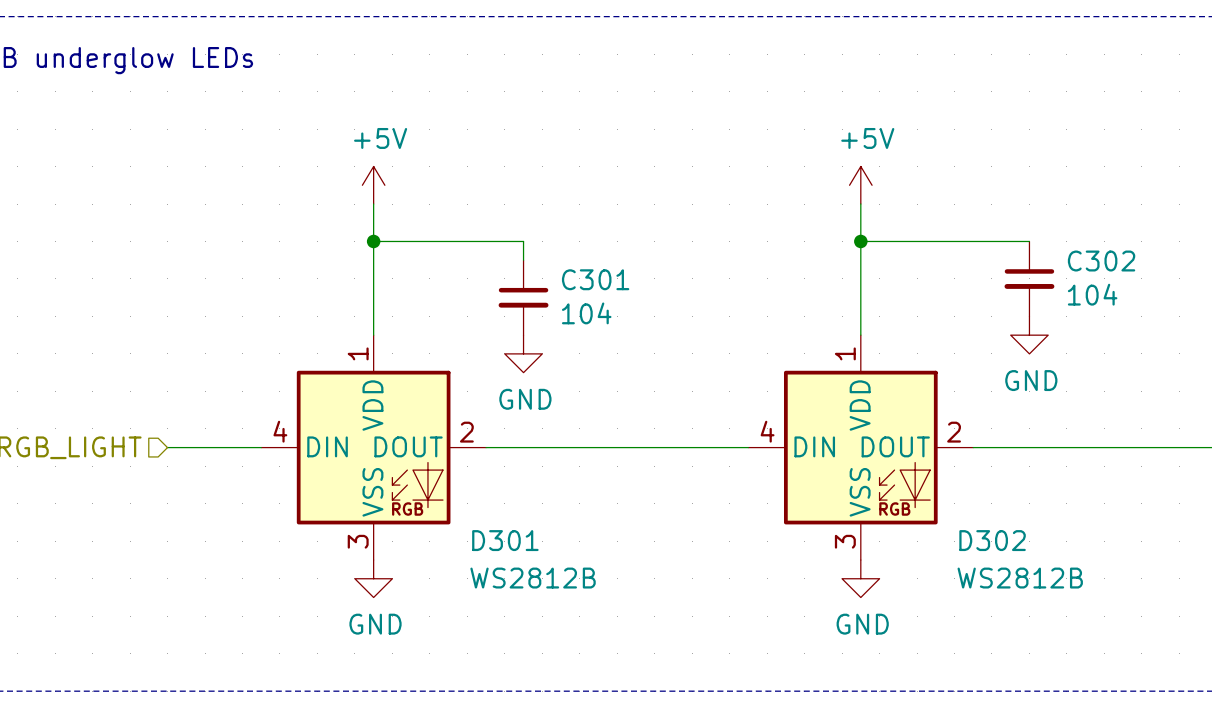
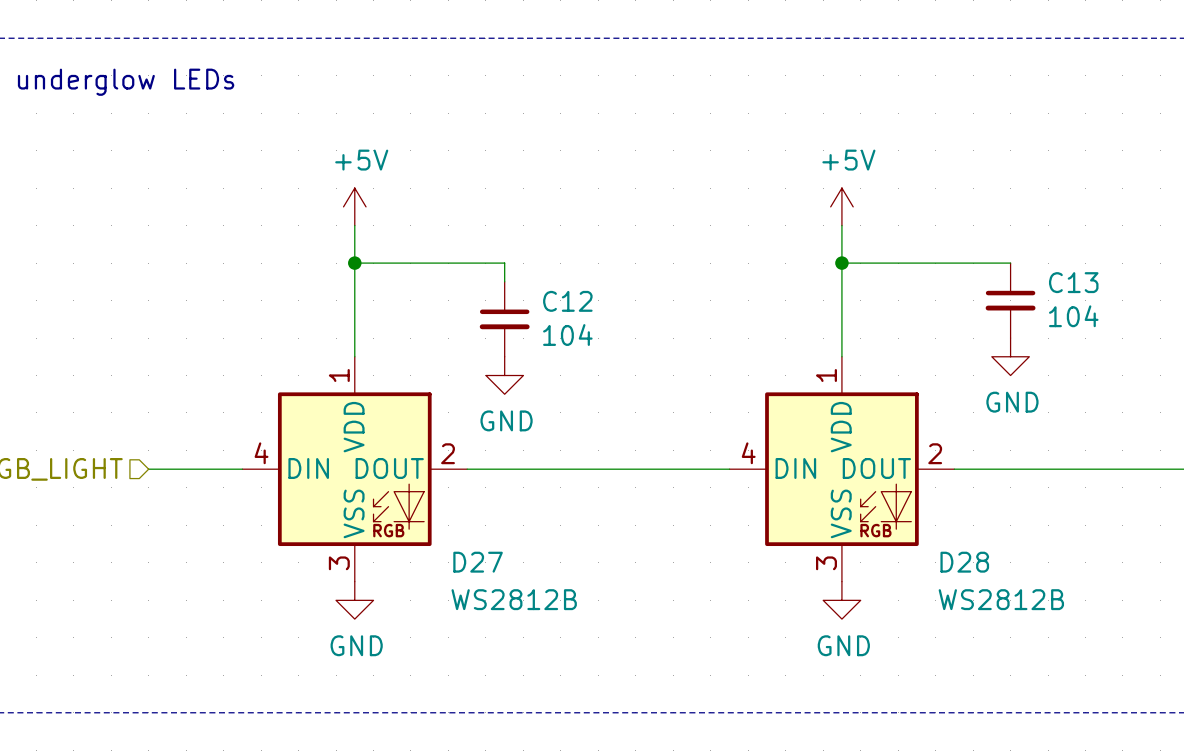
C302 name: C302 (1101, 261) -> C13 (1073, 282)
C301 name: C301 (595, 279) -> C12 (567, 301)
D301 name: D301 (505, 540) -> D27 (478, 562)
D302 name: D302 (992, 540) -> D28 (964, 562)

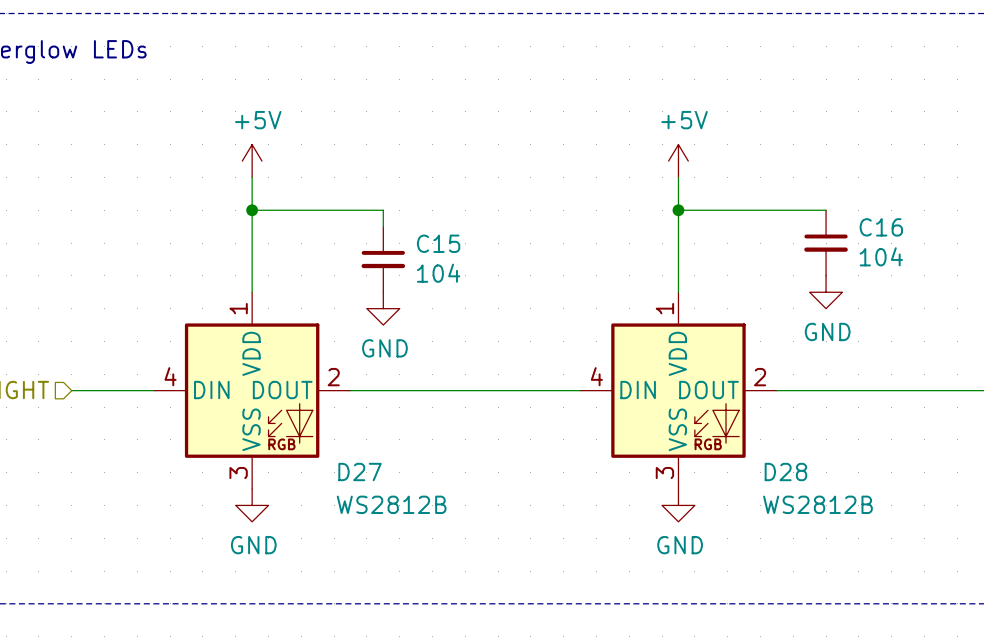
C13 name: C13 (1073, 282) -> C16 (881, 227)
C12 name: C12 (567, 301) -> C15 (438, 243)

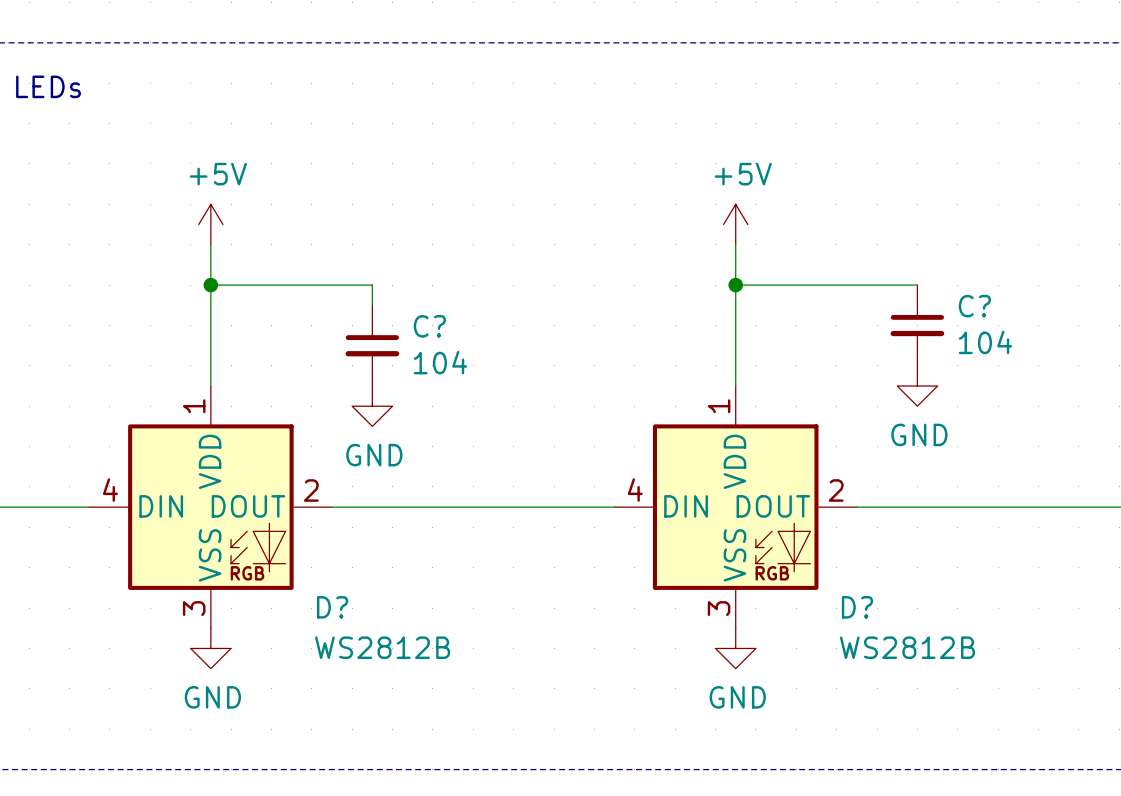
C16 name: C16 (881, 227) -> C? (974, 306)
C15 name: C15 (438, 243) -> C? (429, 326)
D27 name: D27 (360, 472) -> D? (332, 607)
D28 name: D28 (785, 472) -> D? (857, 607)

